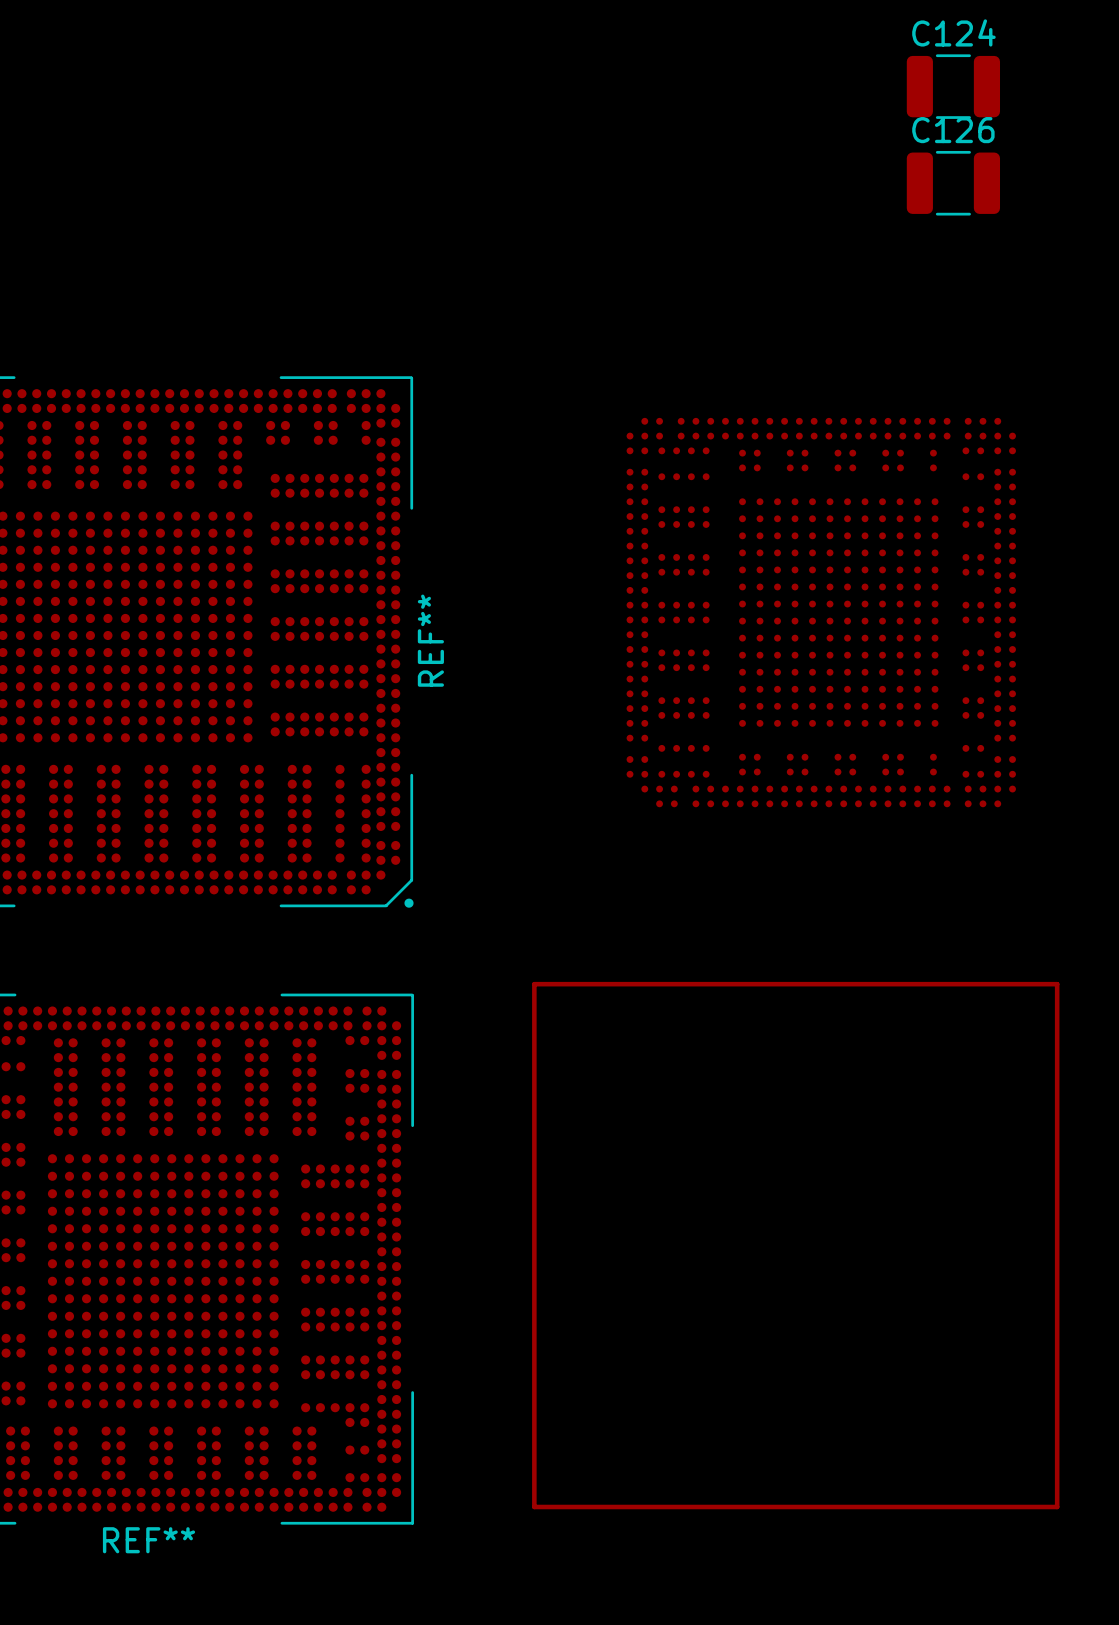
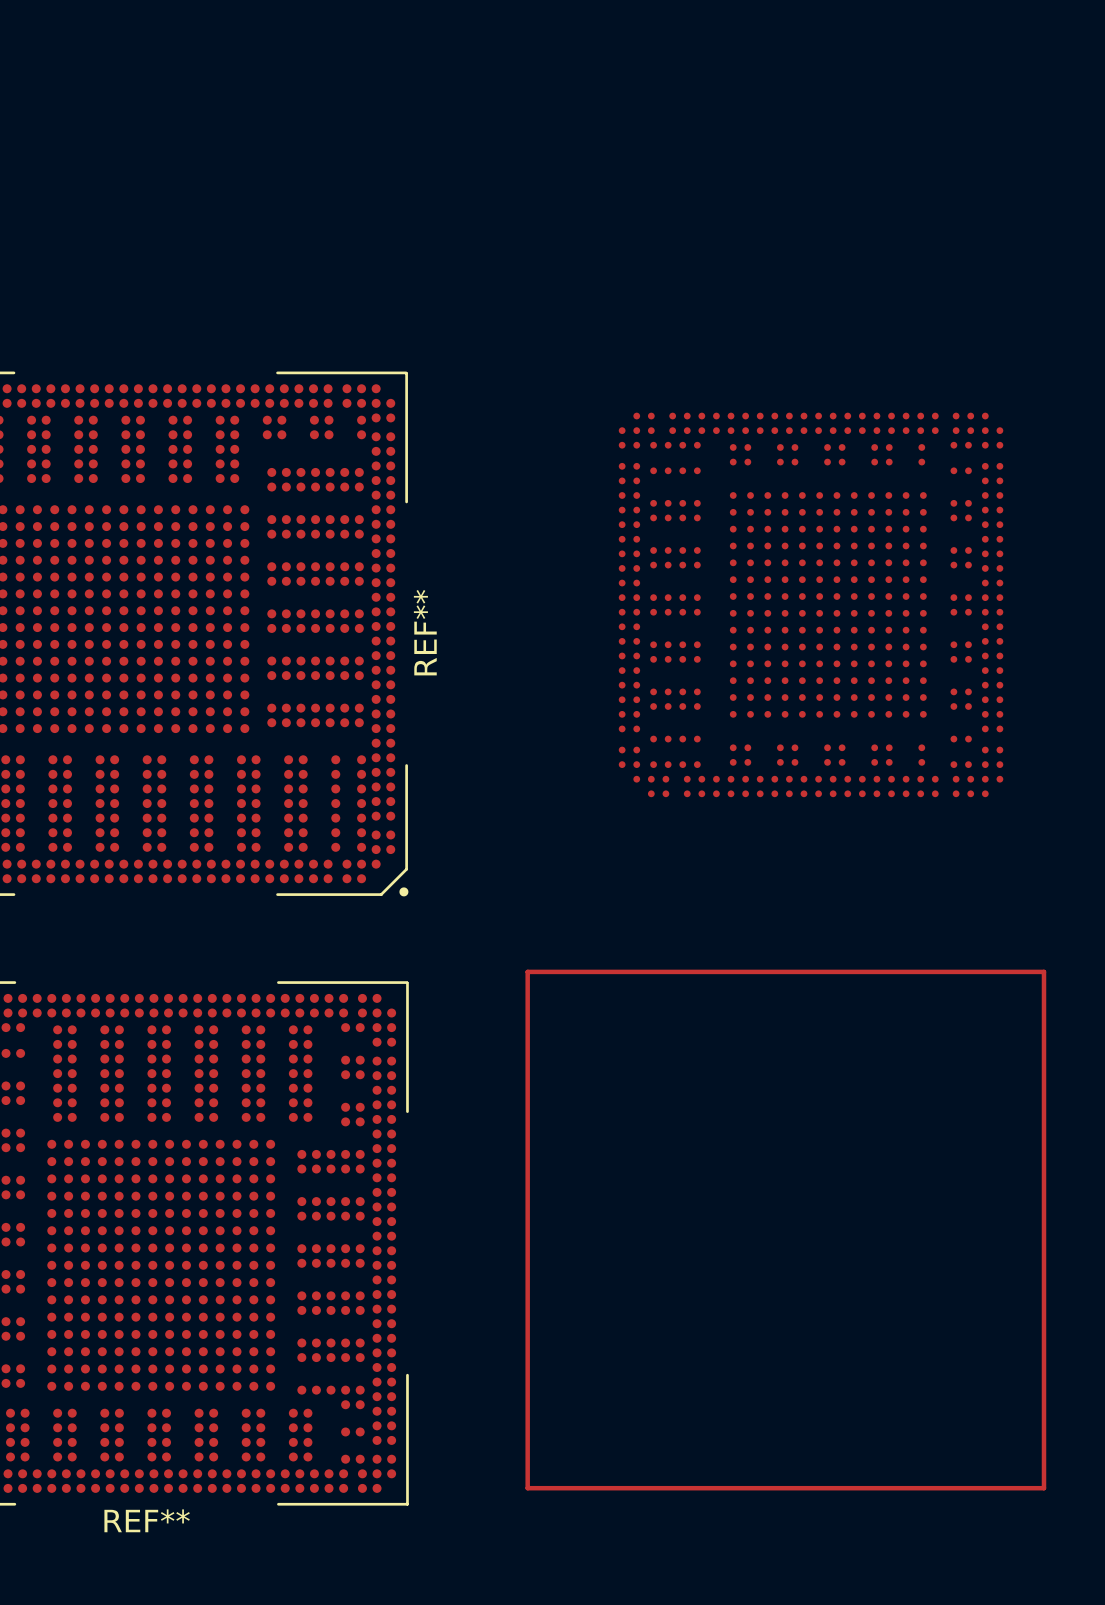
C124: (953, 86) -> none
C126: (953, 183) -> none

